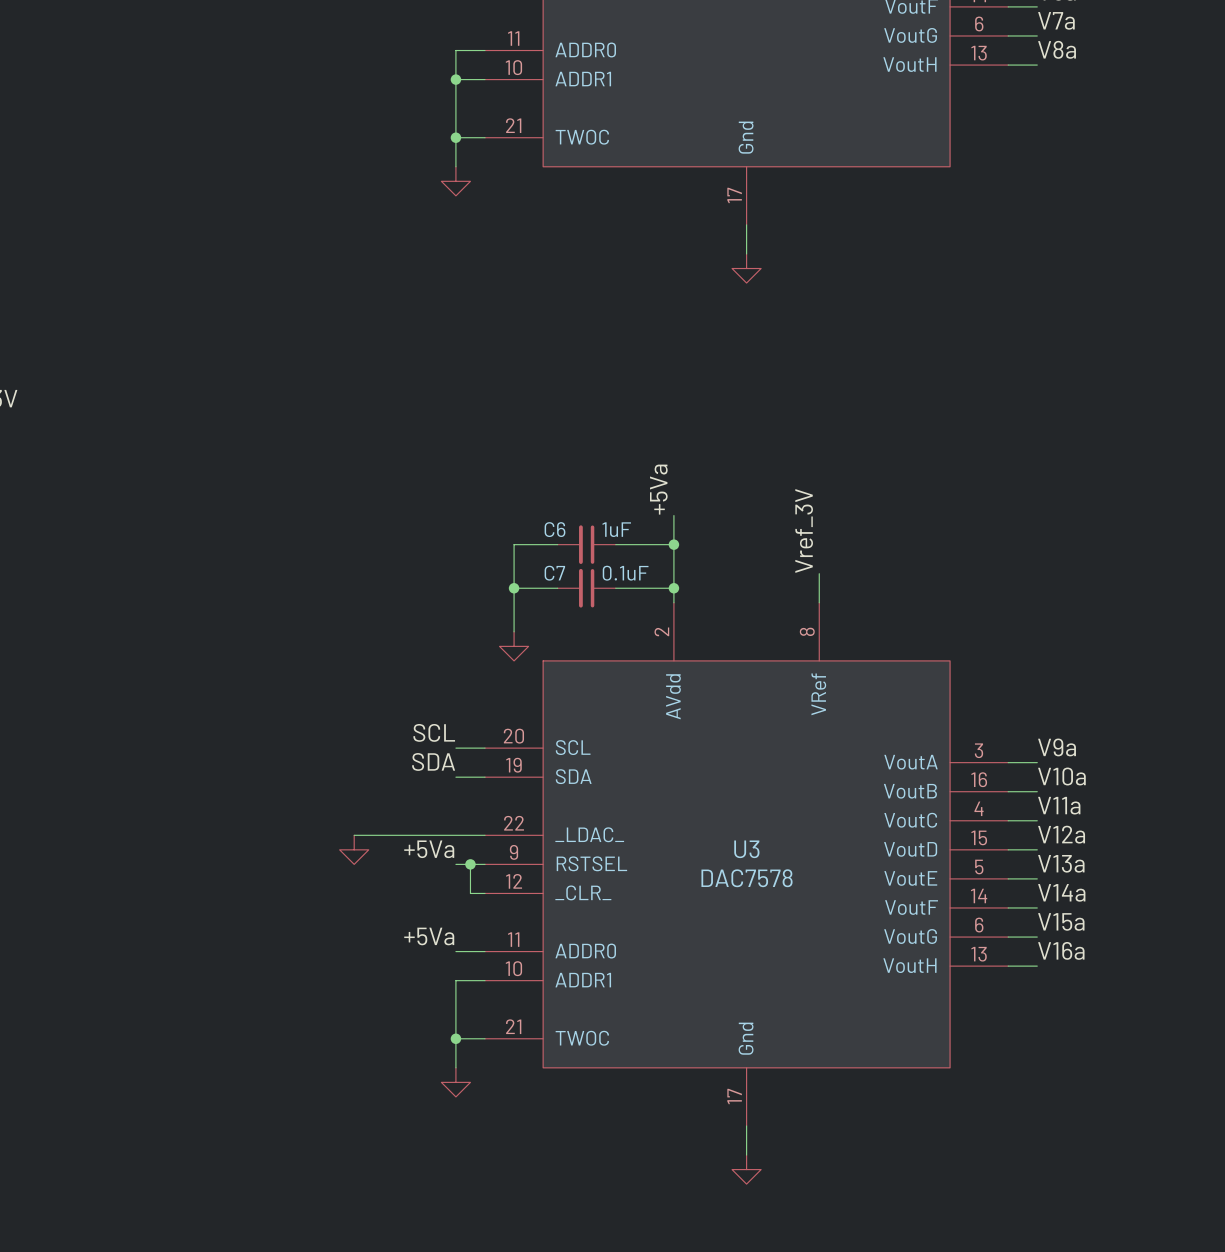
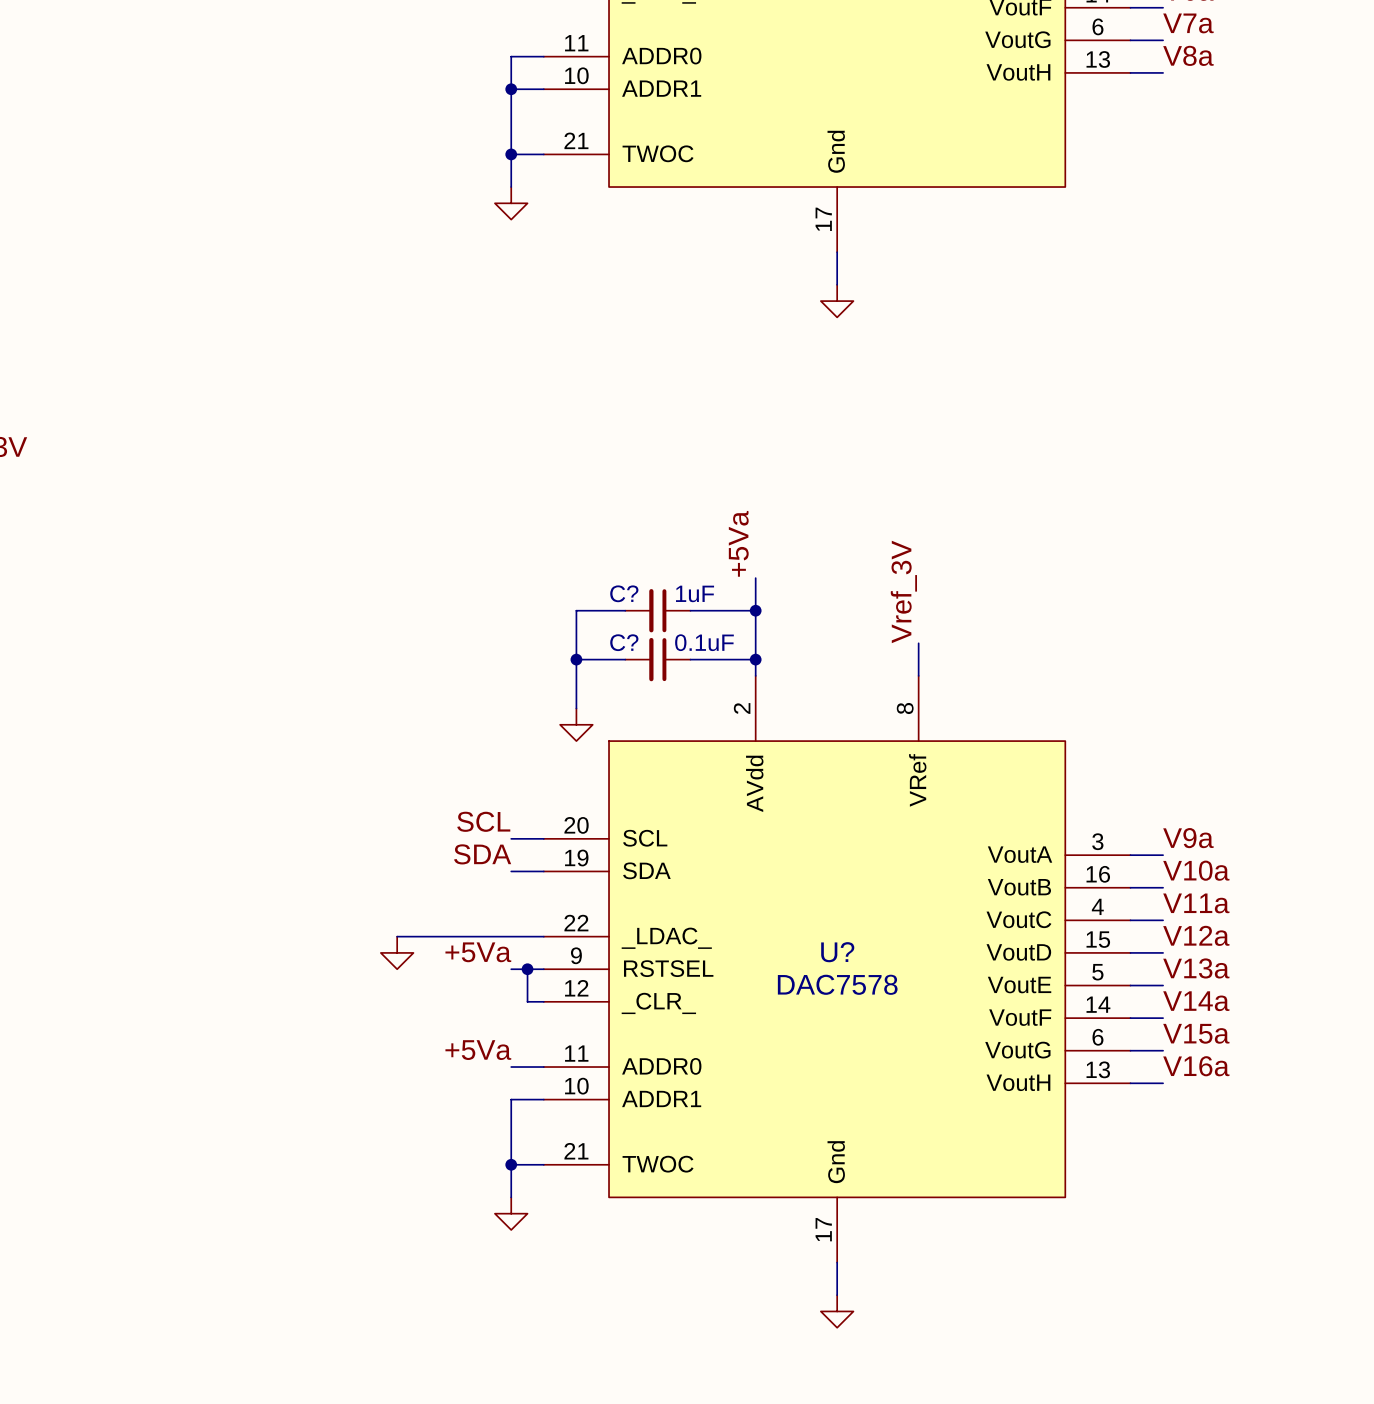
C6 name: C6 (555, 529) -> C? (624, 593)
C7 name: C7 (554, 573) -> C? (624, 642)
U3 name: U3 (746, 849) -> U? (837, 952)

